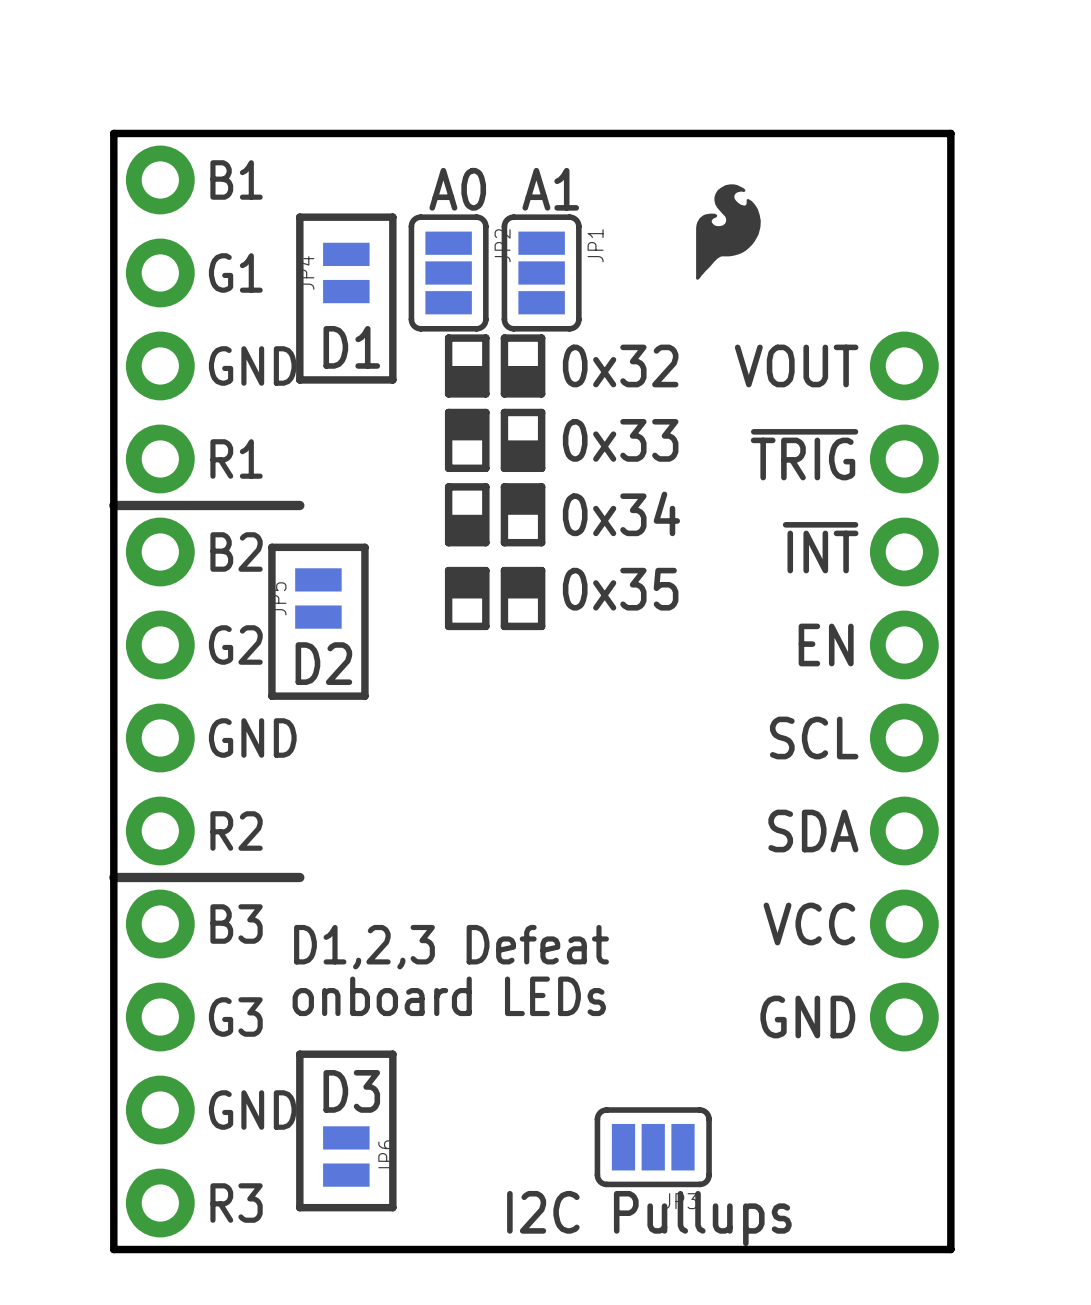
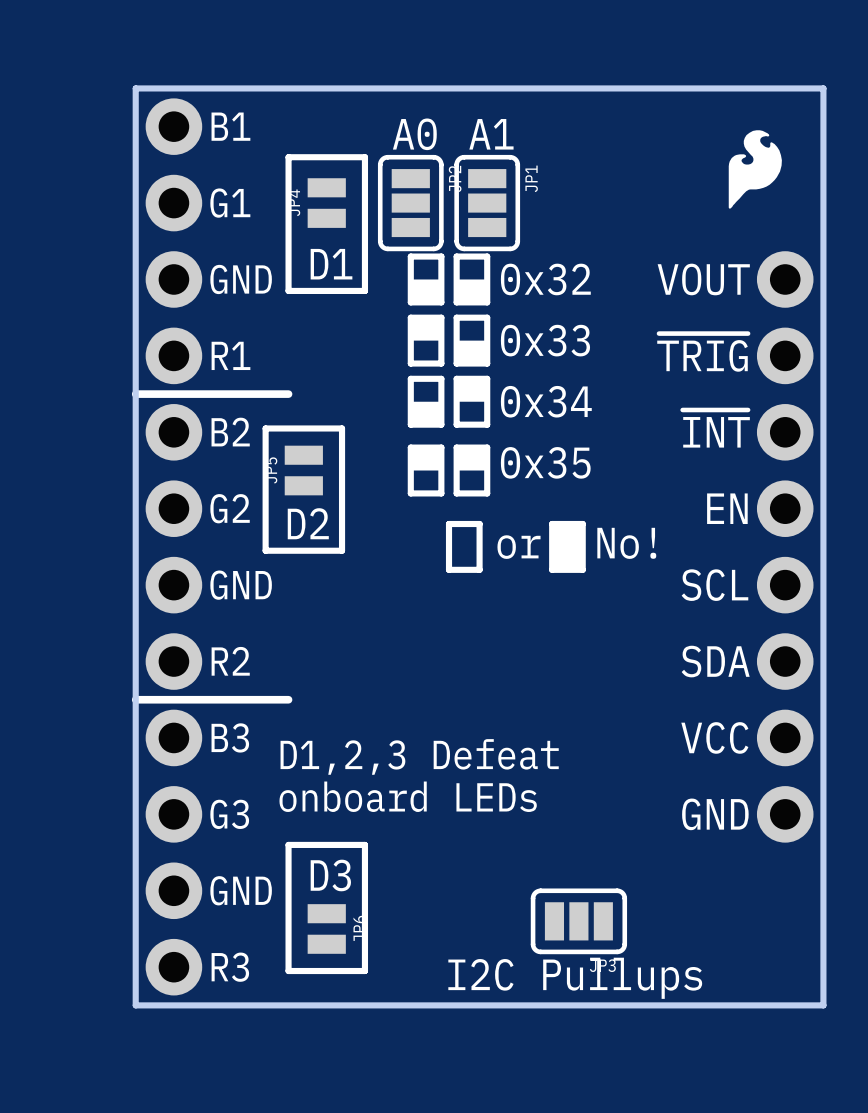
drawing position: (728, 232) -> (755, 169)
line: none -> (479, 524) (449, 524) (449, 569) (479, 569) (479, 524)
drawing: none -> [552, 524, 583, 570]
line: none -> (582, 524) (552, 524) (552, 569) (582, 569) (582, 524)
text: none -> No! (626, 543)
text: none -> or (519, 547)

